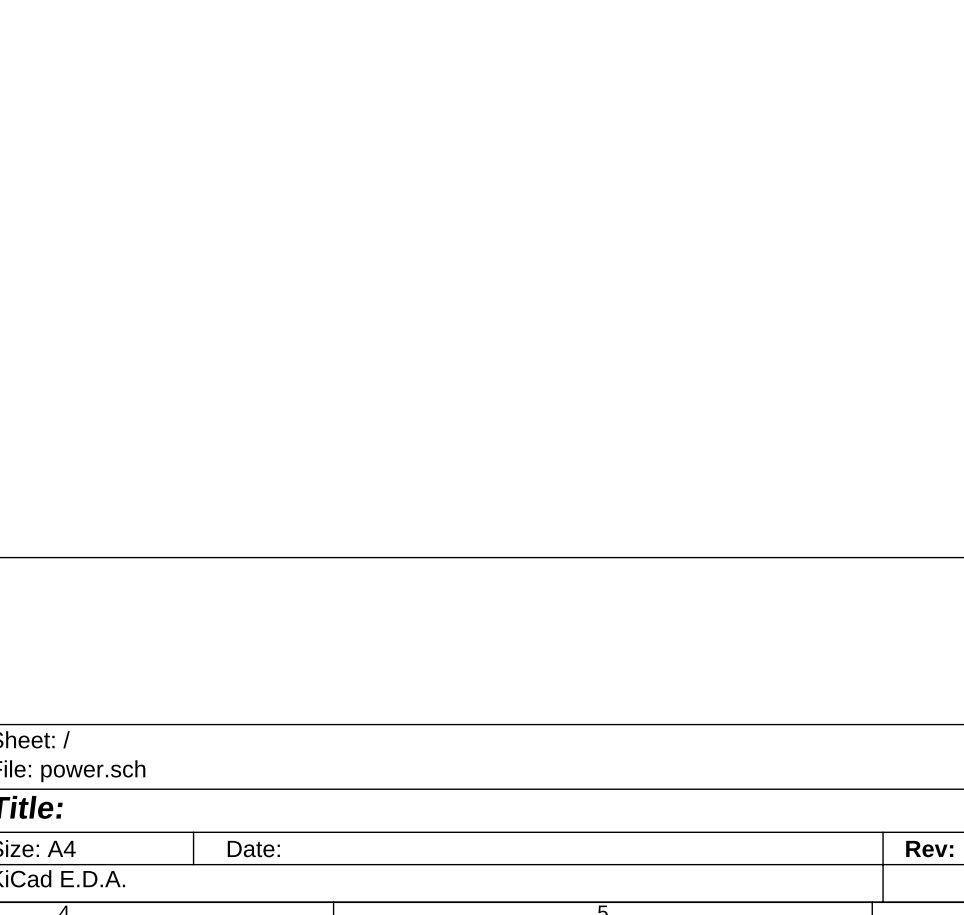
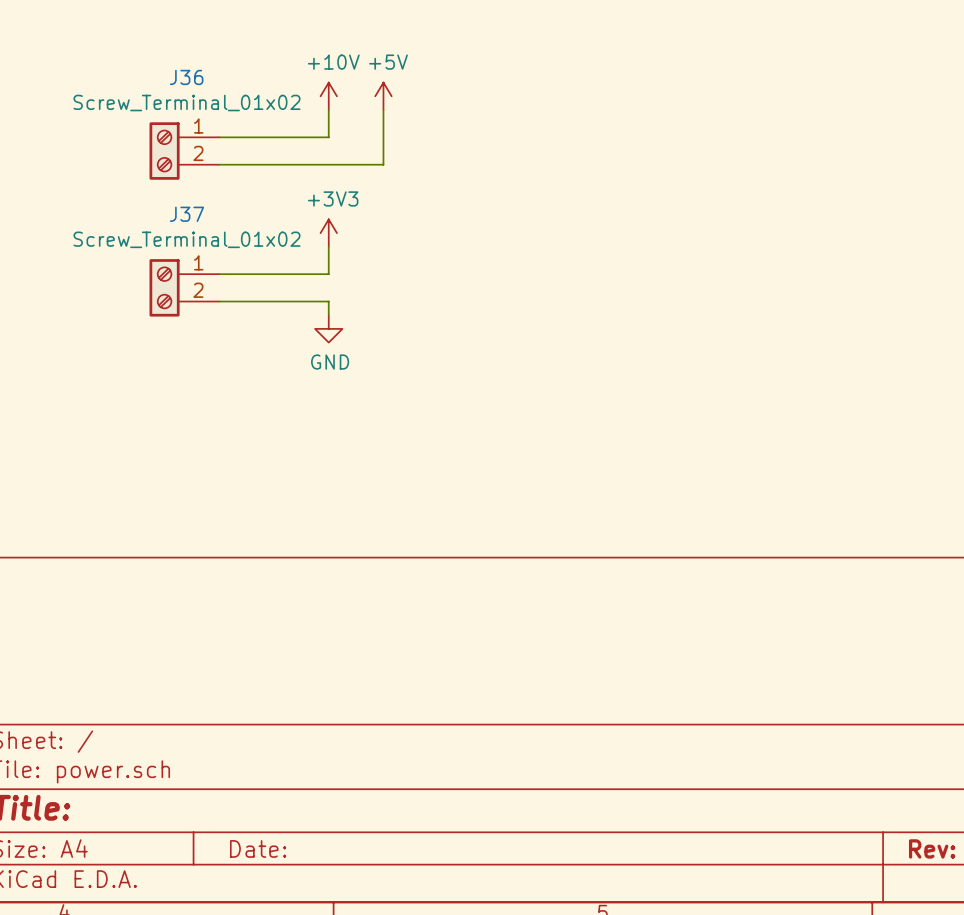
power symbol: none -> +10V (328, 96)
power symbol: none -> +5V (383, 96)
wire: none -> (328, 109) (328, 137) (219, 137)
wire: none -> (383, 109) (383, 164) (219, 164)
J36: none -> Screw_Terminal_01x02 (184, 151)
power symbol: none -> +3V3 (328, 233)
wire: none -> (328, 246) (328, 274) (219, 274)
J37: none -> Screw_Terminal_01x02 (184, 287)
wire: none -> (219, 301) (328, 301) (328, 315)
power symbol: none -> GND (328, 328)

